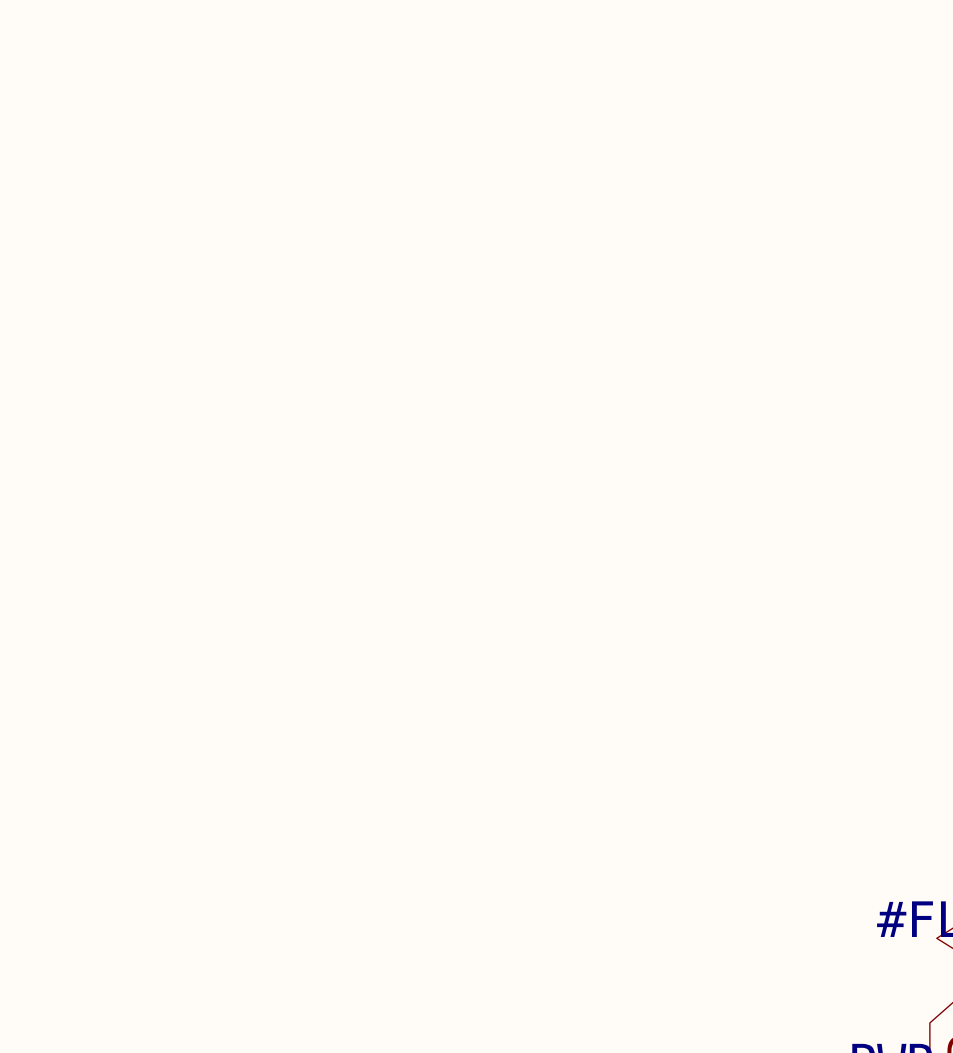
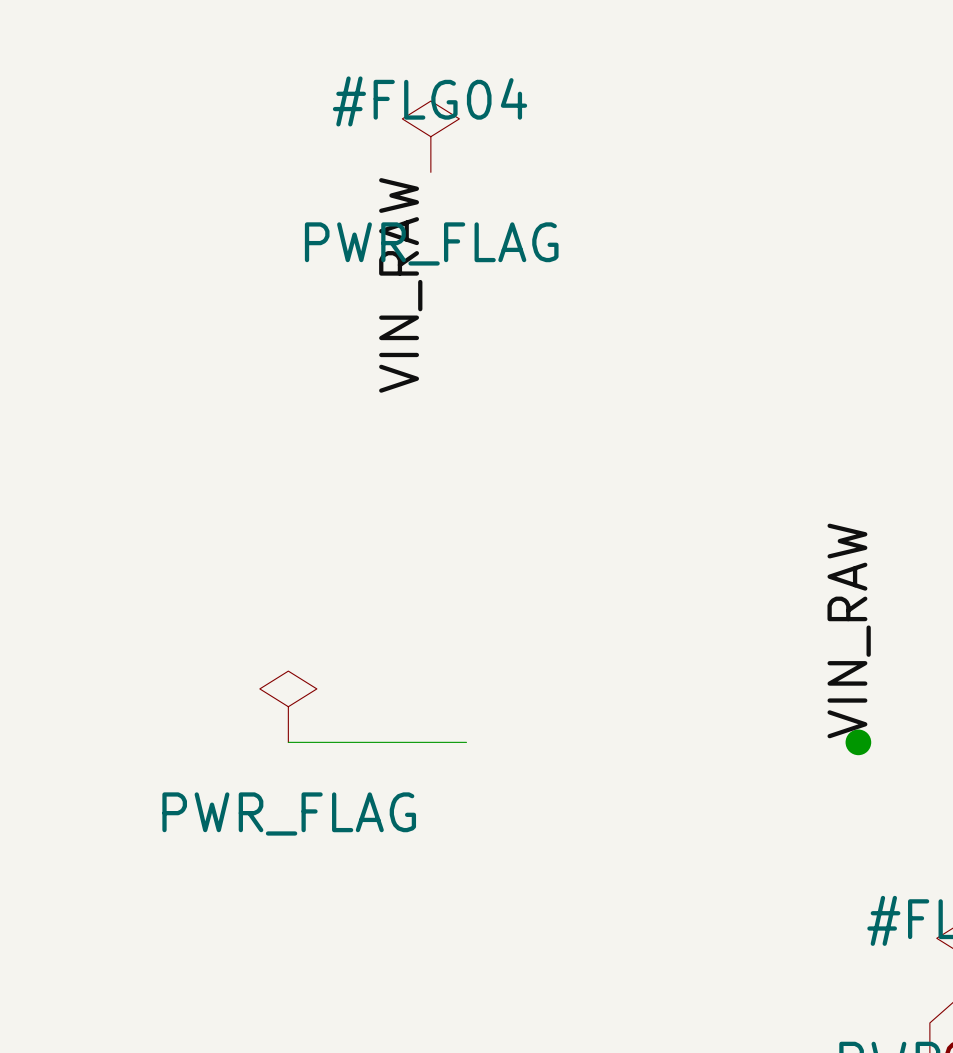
#FLG04: none -> PWR_FLAG (430, 136)
label: none -> VIN_RAW (400, 285)
label: none -> VIN_RAW (849, 630)
power symbol: none -> PWR_FLAG (288, 706)
wire: none -> (288, 742) (466, 742)
junction: none -> (858, 742)

